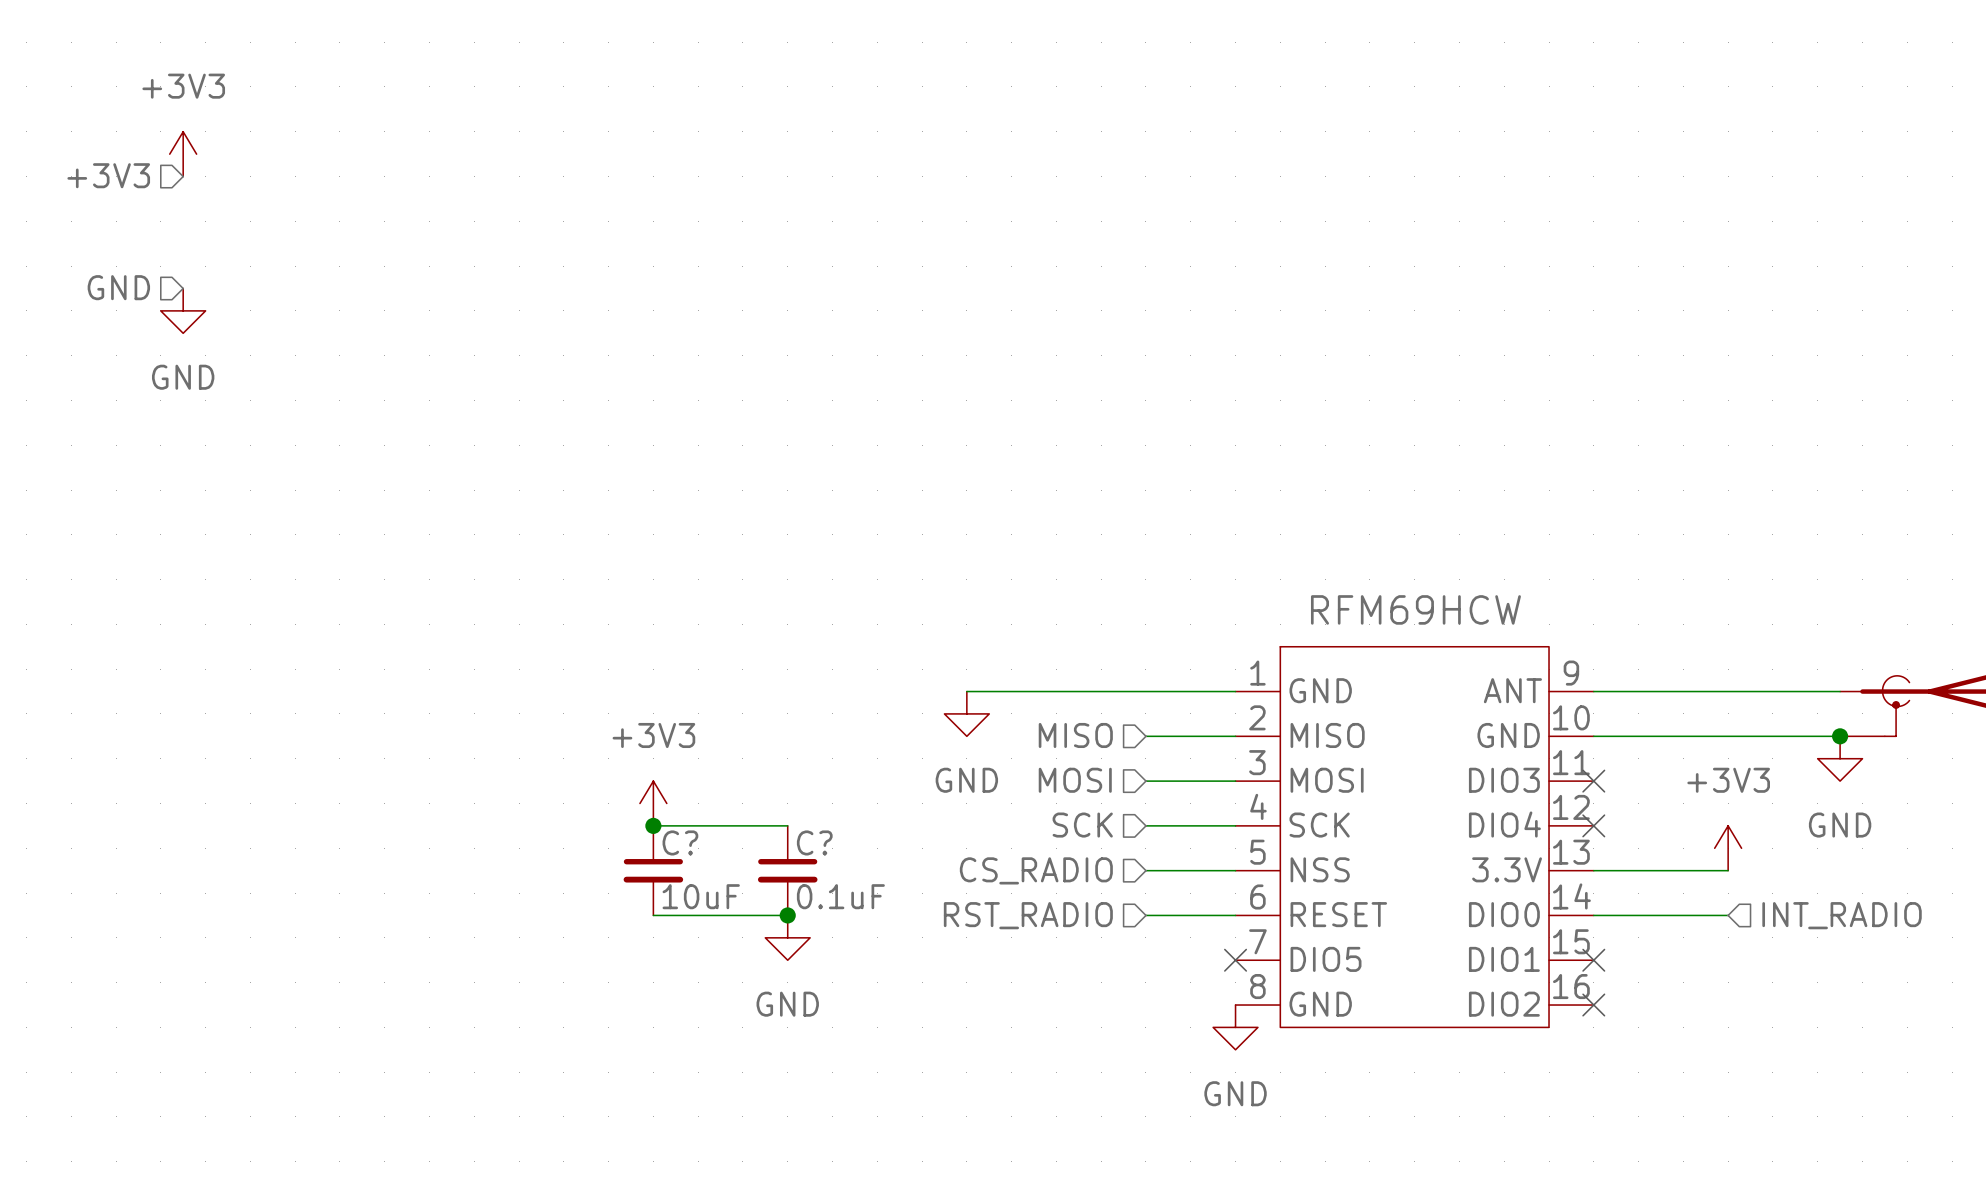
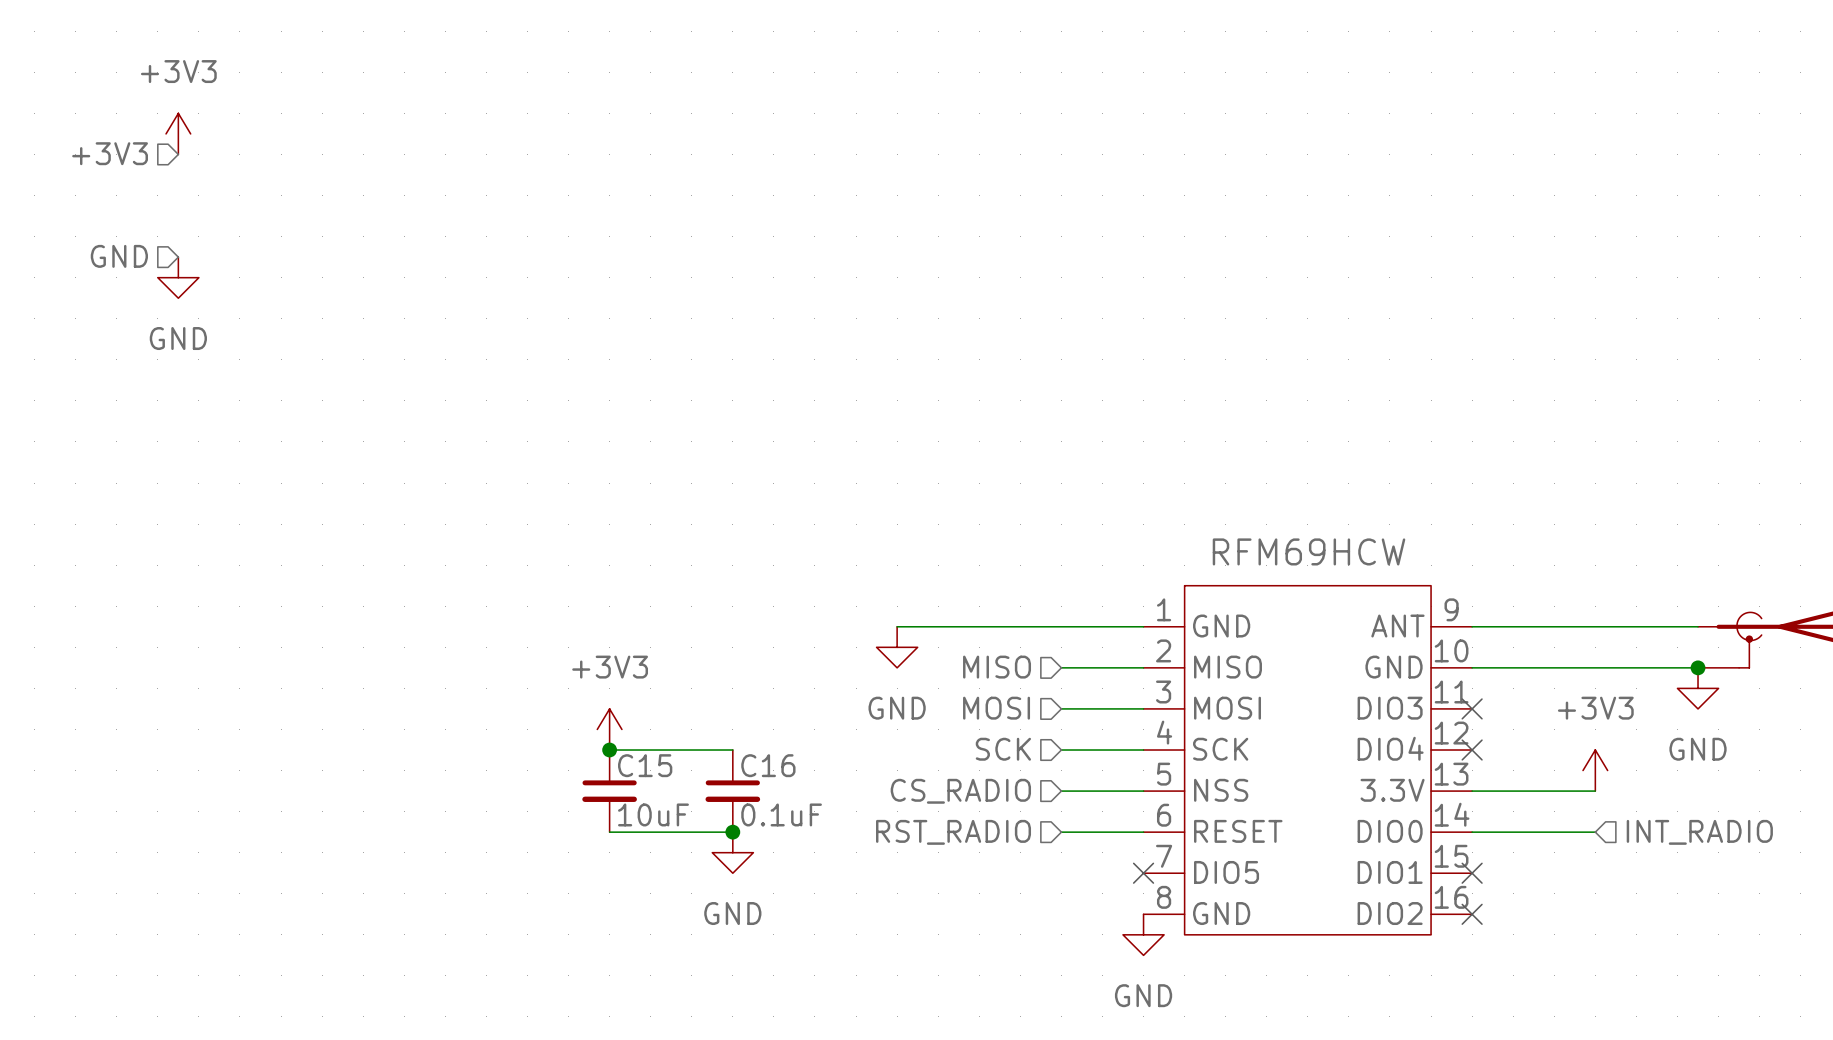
C? name: C? (680, 842) -> C15 (645, 765)
C? name: C? (814, 842) -> C16 (768, 765)

